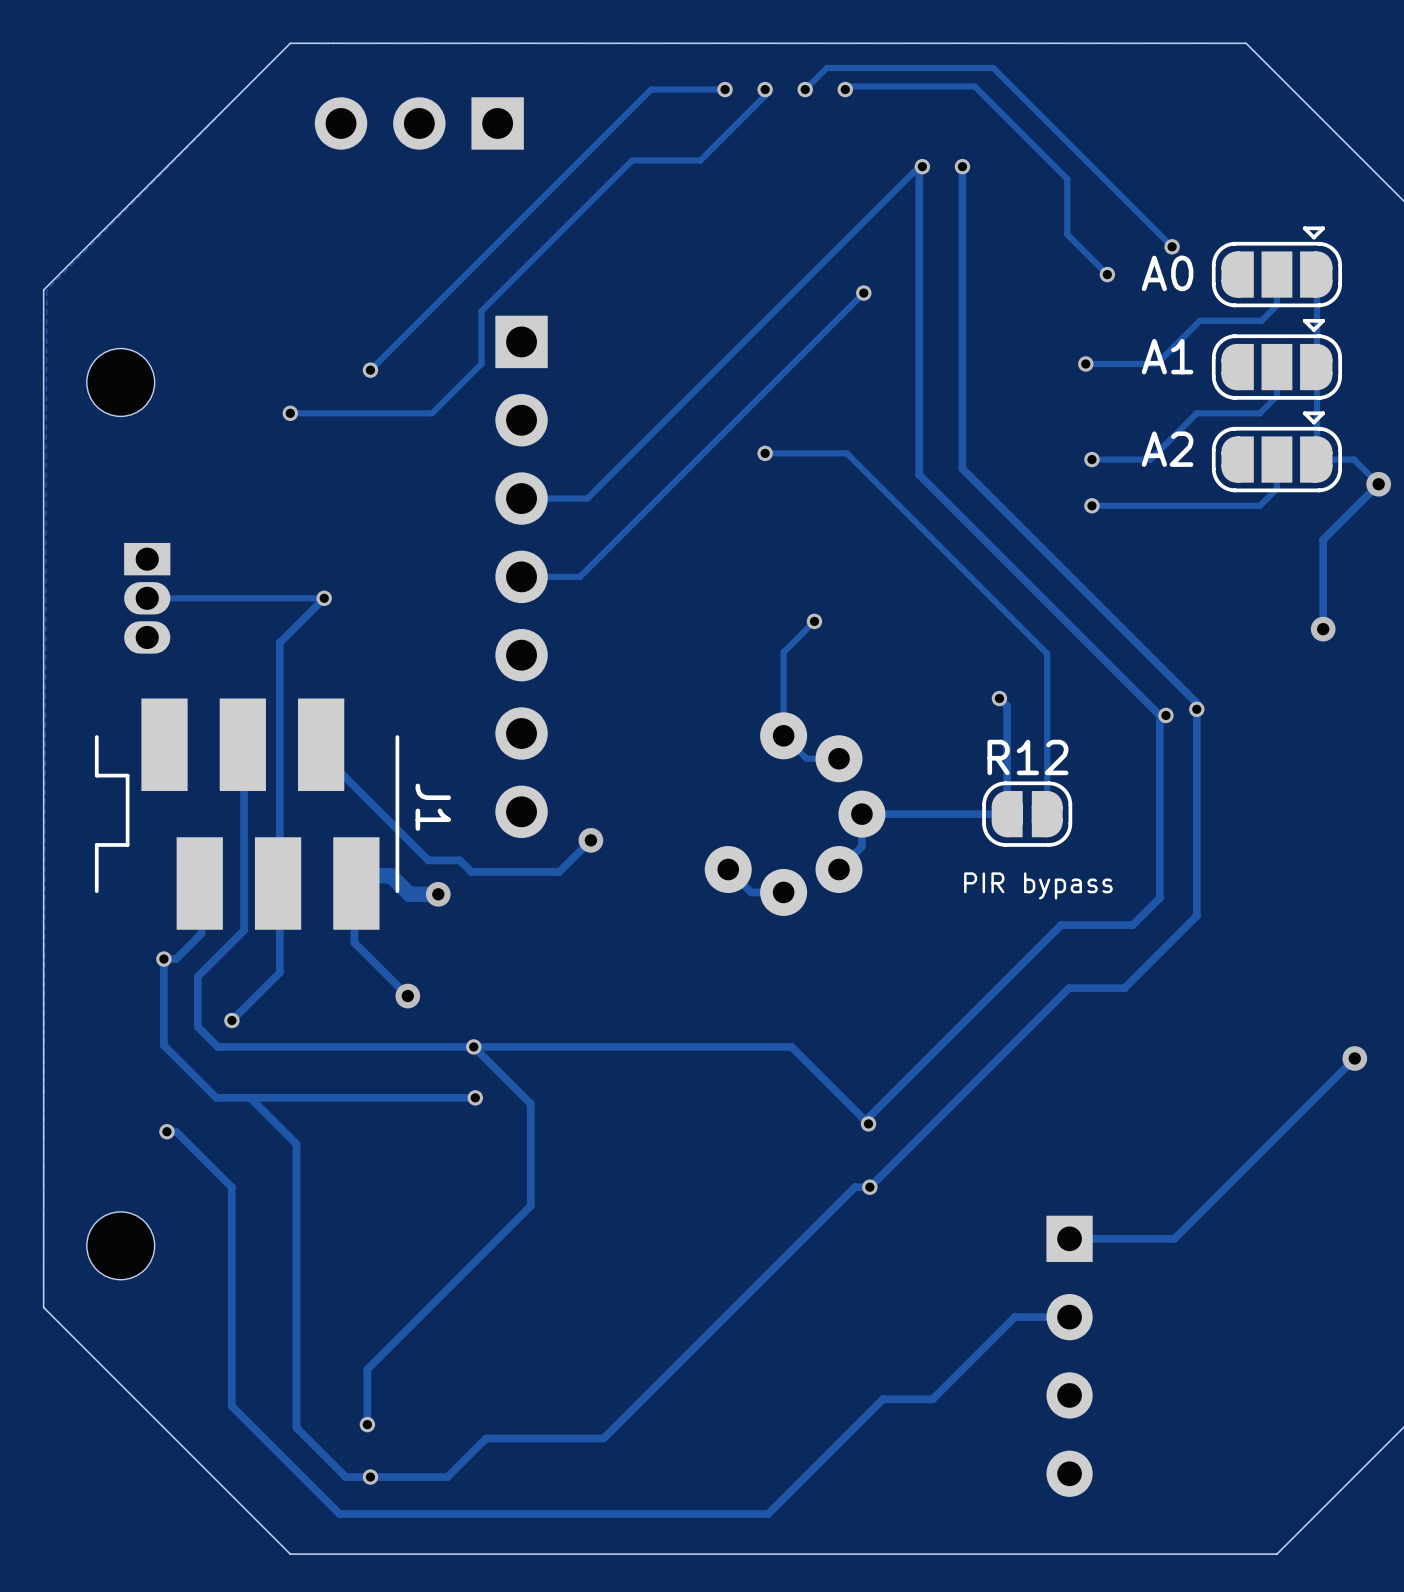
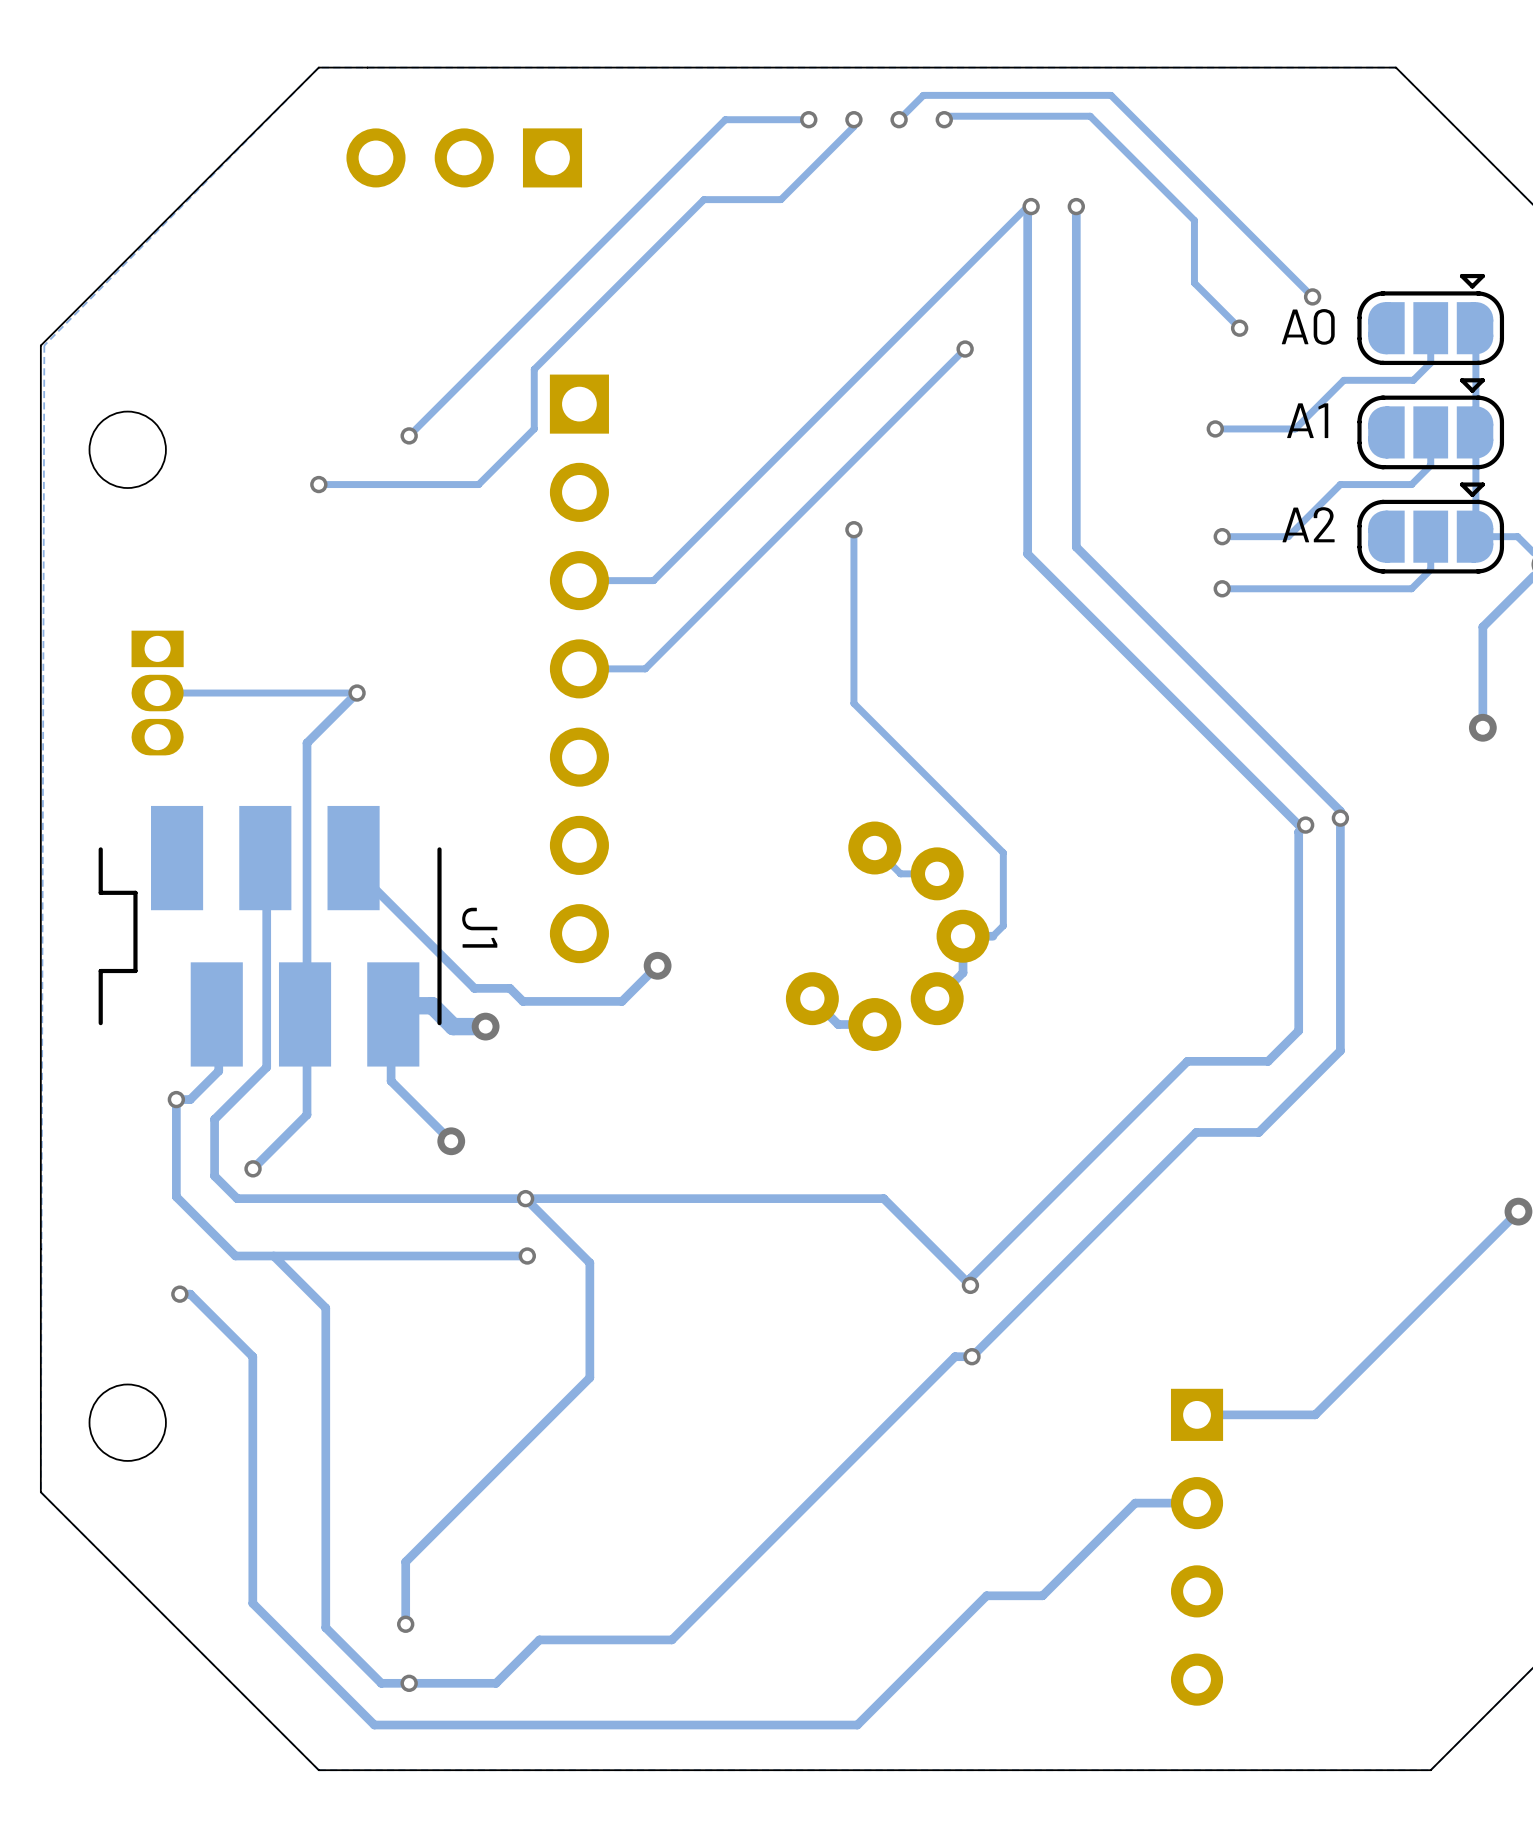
track: (765, 453) (846, 453) (1047, 653) (1047, 814) -> (853, 529) (853, 703) (1003, 852) (1003, 925) (992, 936)
track: (814, 621) (783, 652) (783, 735) -> none
via: (814, 621) -> none
track: (999, 698) (1007, 706) (1007, 814) (888, 814) -> none
via: (999, 698) -> none
R12: (1027, 814) -> none
text: PIR bypass (1038, 885) -> none

